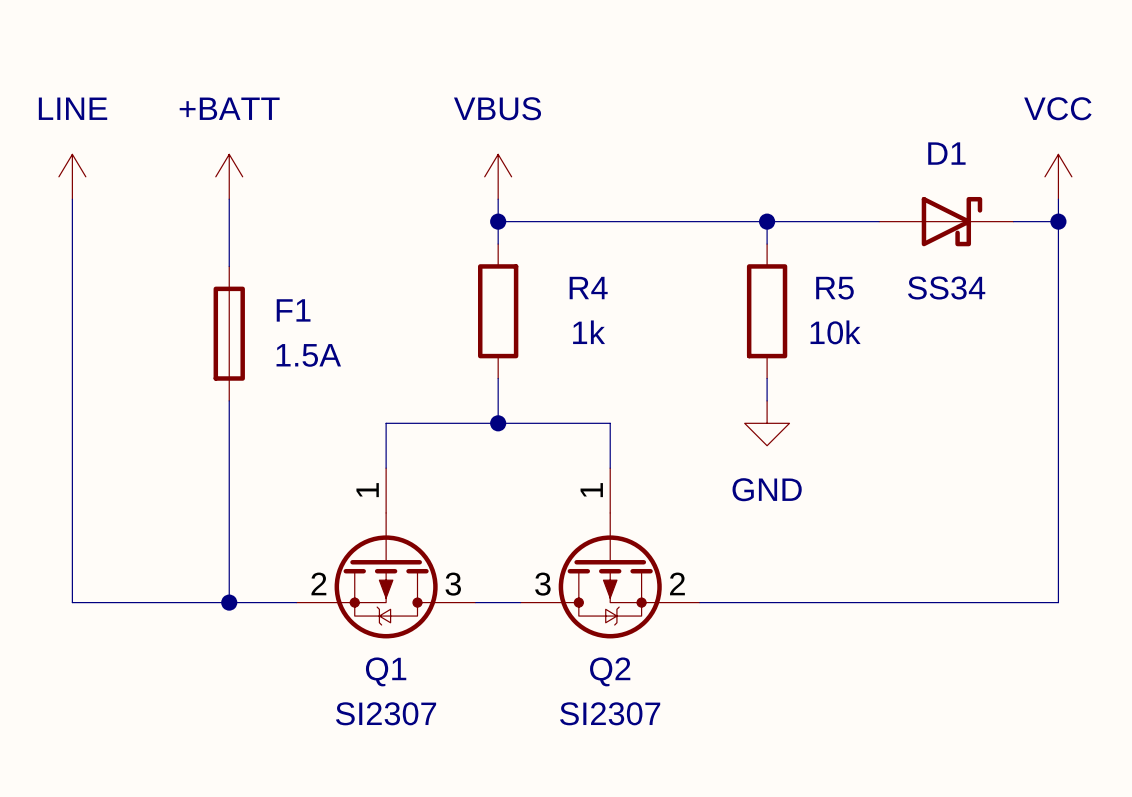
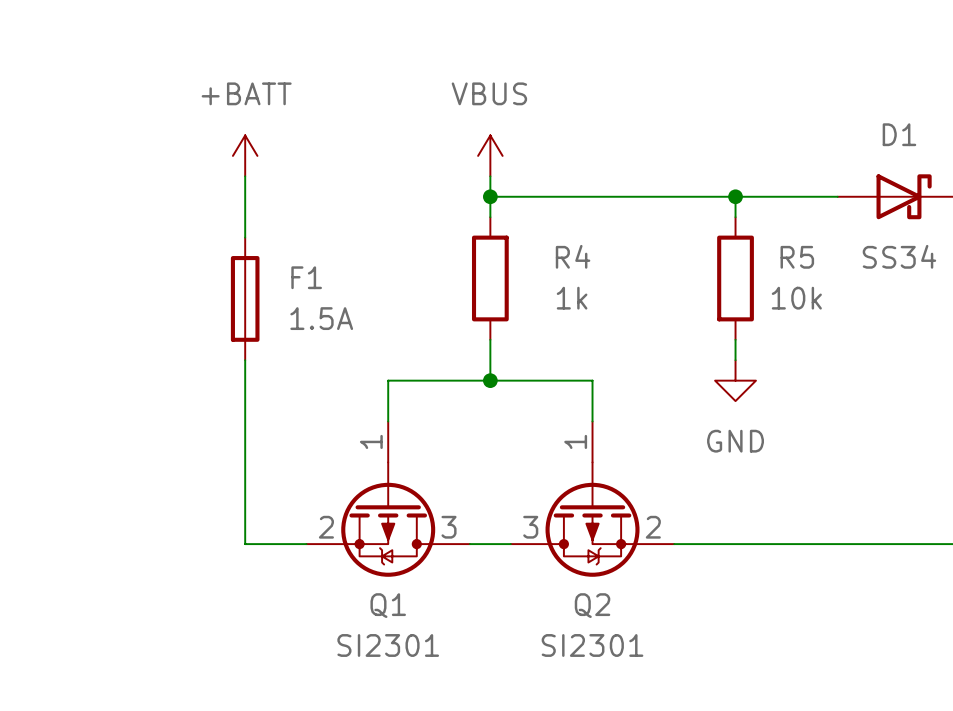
power symbol: LINE (72, 176) -> none
wire: (72, 199) (72, 602) (229, 602) -> none
junction: (229, 602) -> none
Q1 value: SI2307 (386, 713) -> SI2301 (388, 645)
Q2 value: SI2307 (610, 713) -> SI2301 (592, 645)

